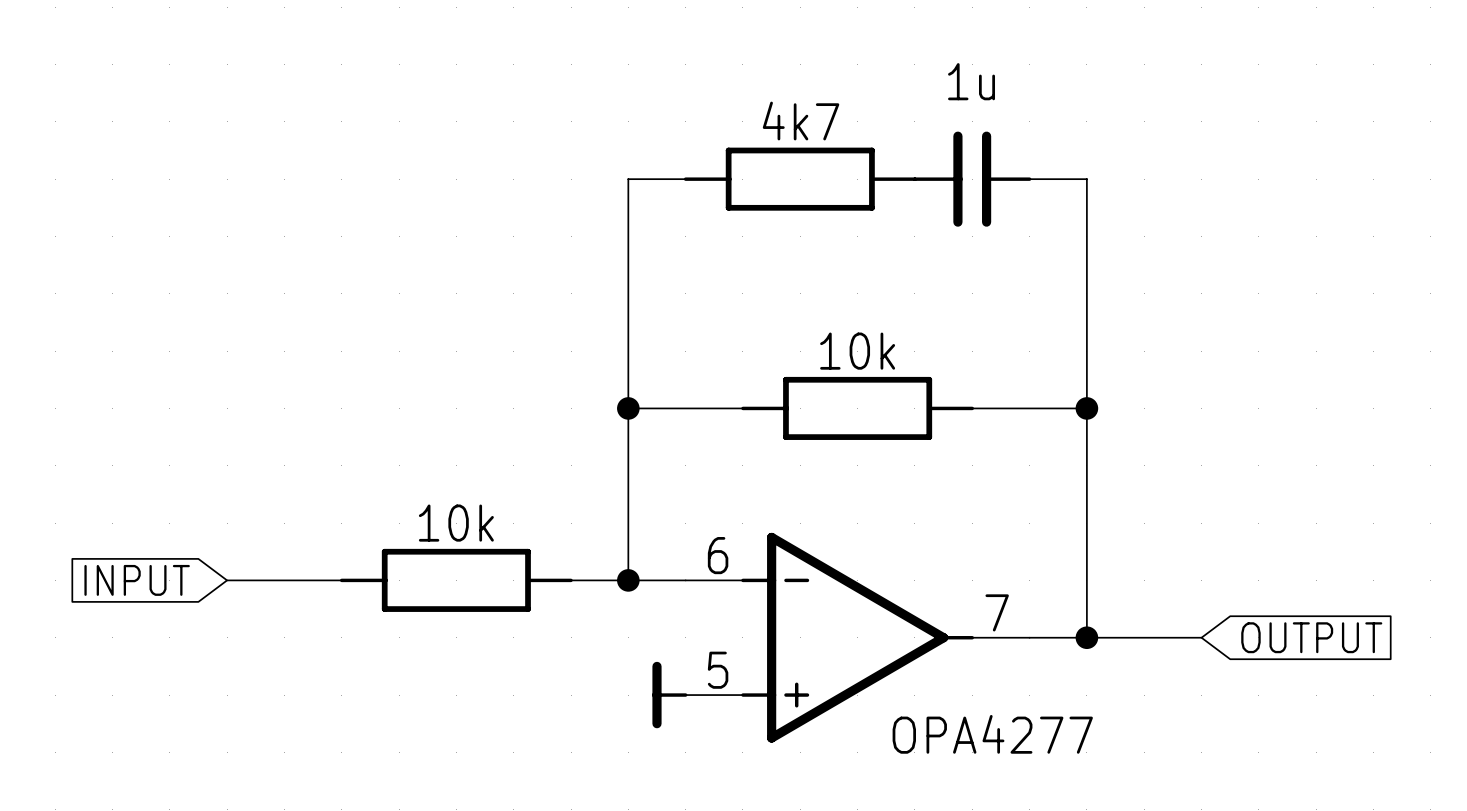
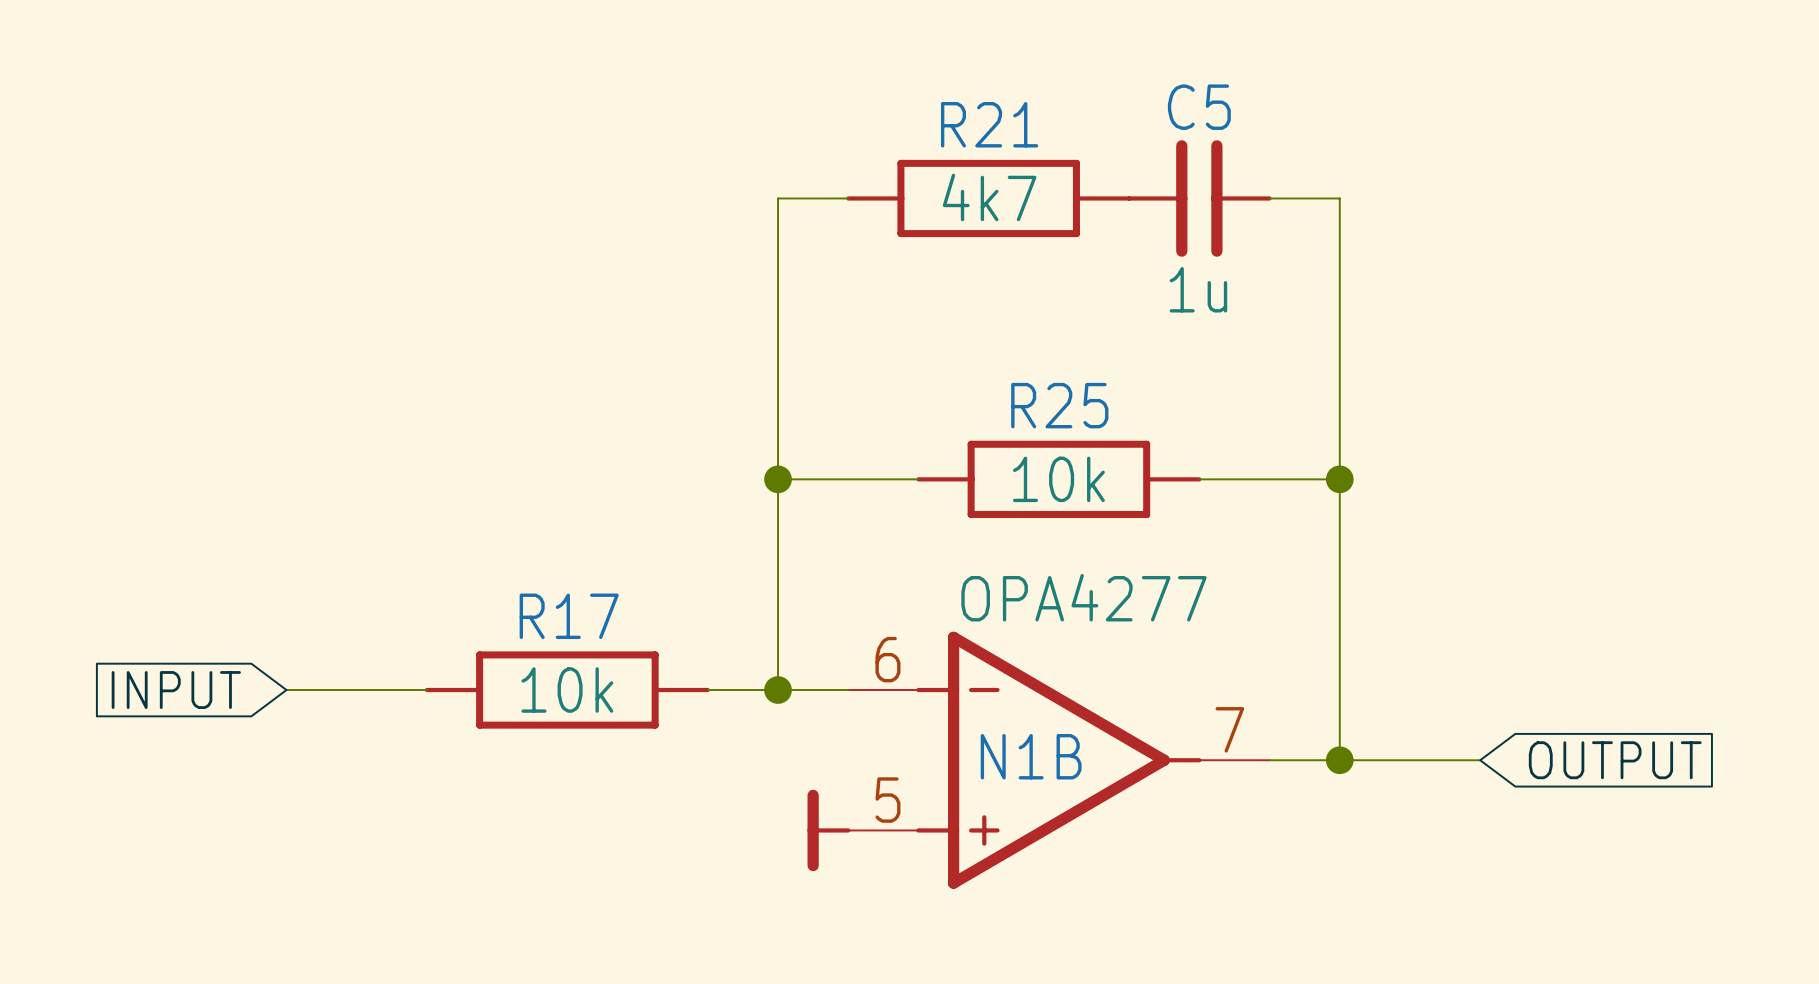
C5 value position: 1u (971, 81) -> 1u (1198, 289)
C5 name: none -> C5 (1199, 107)
R21 name: none -> R21 (989, 124)
R21 value position: 4k7 (801, 121) -> 4k7 (989, 197)
R25 name: none -> R25 (1059, 405)
R25 value position: 10k (857, 351) -> 10k (1058, 479)
R17 name: none -> R17 (569, 616)
R17 value position: 10k (456, 523) -> 10k (567, 690)
N1B name: none -> N1B (1031, 756)
N1B value position: OPA4277 (992, 734) -> OPA4277 (1084, 597)

